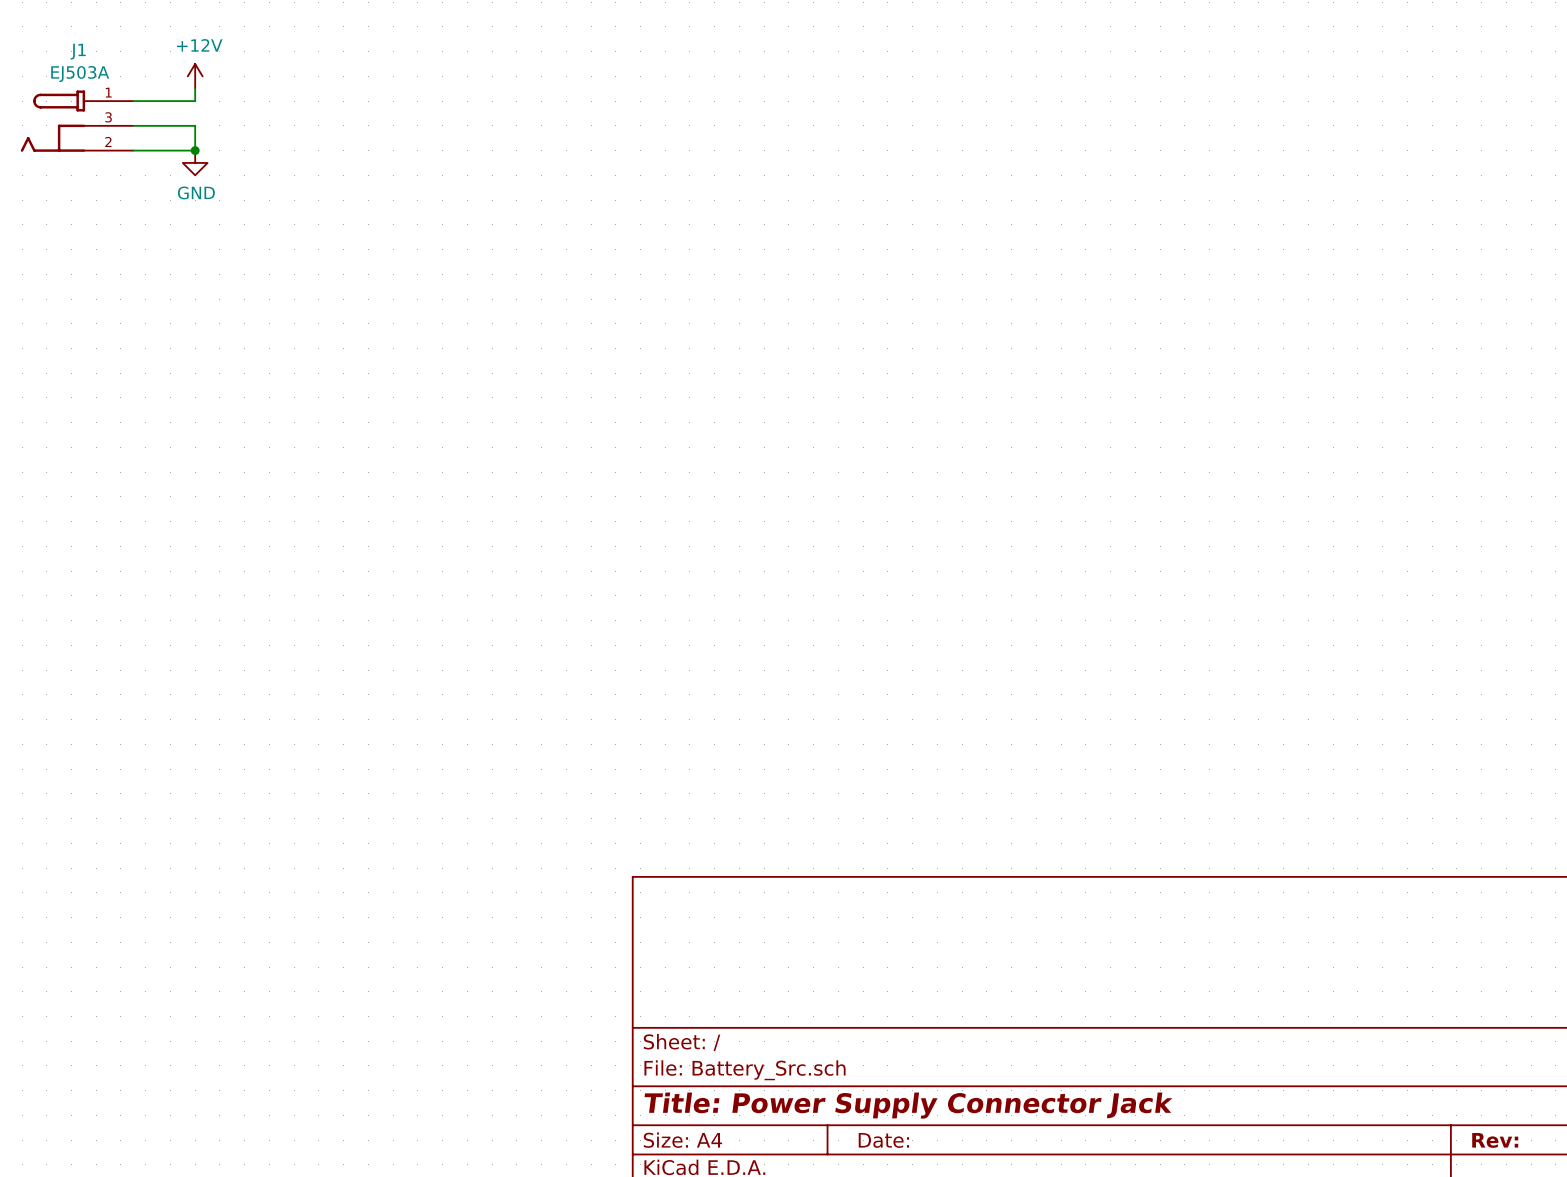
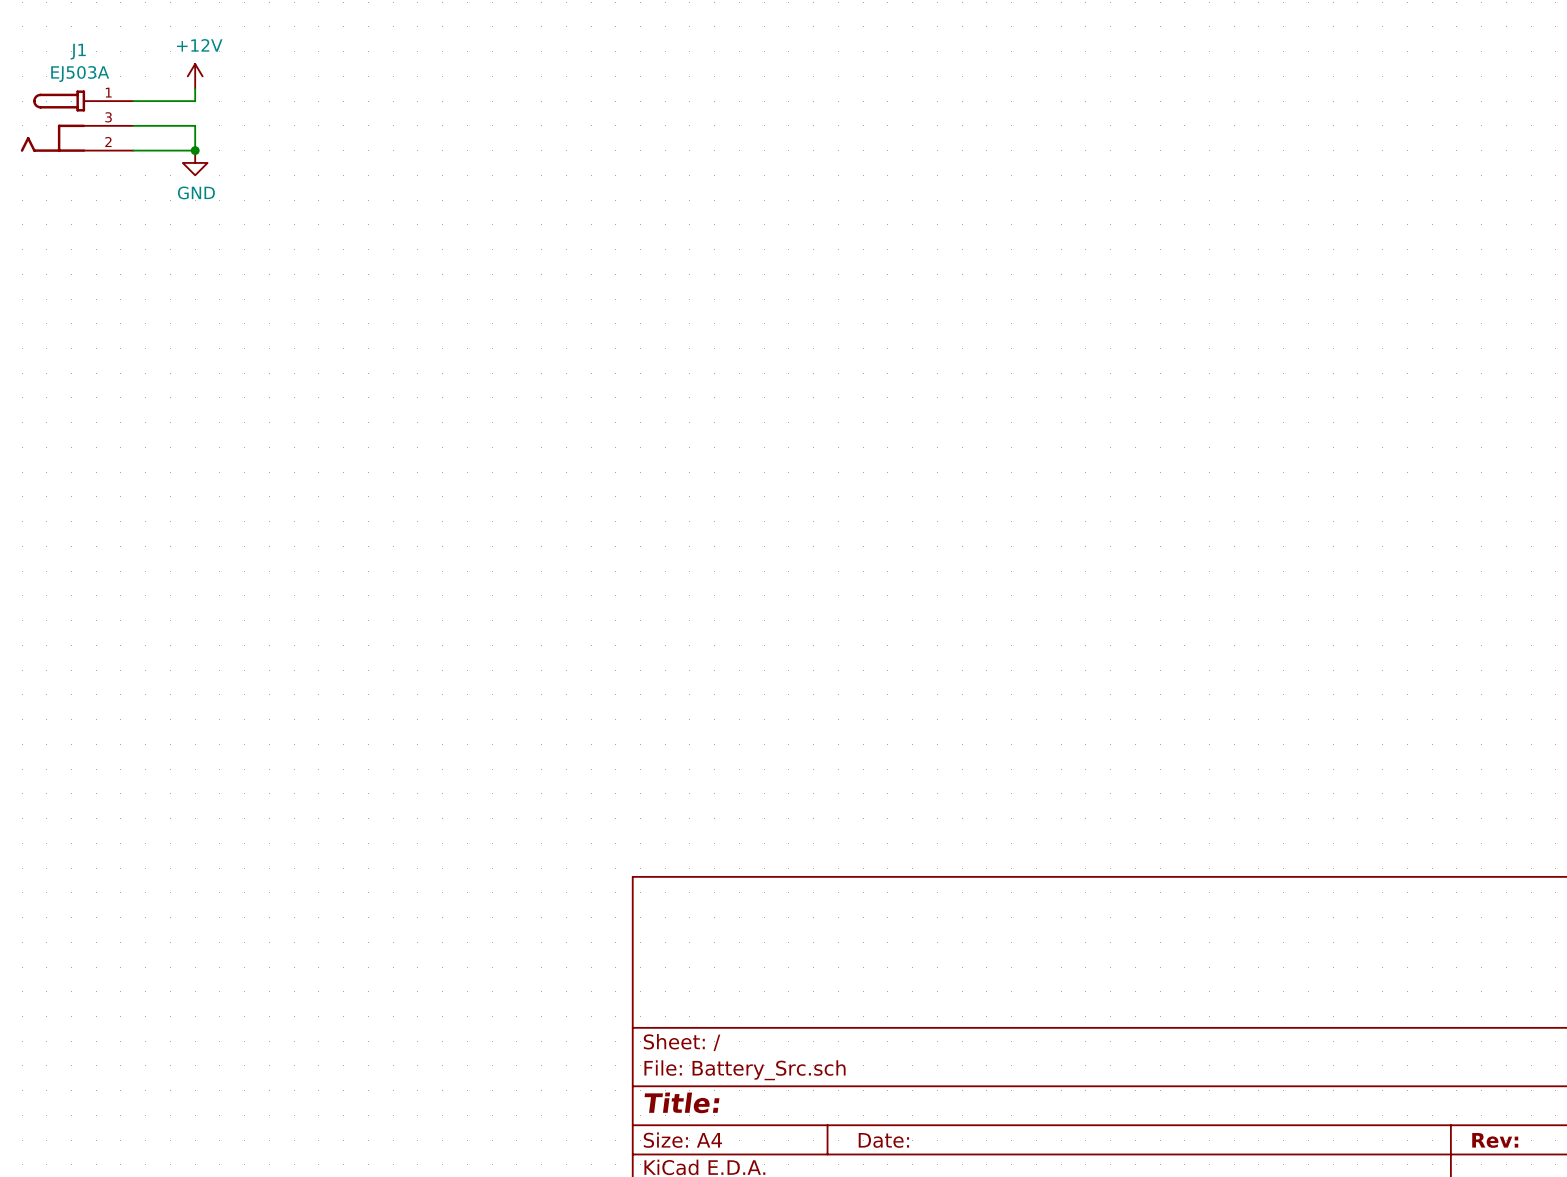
title block: Title: Power Supply Connector Jack (908, 1105) -> Title: (681, 1102)

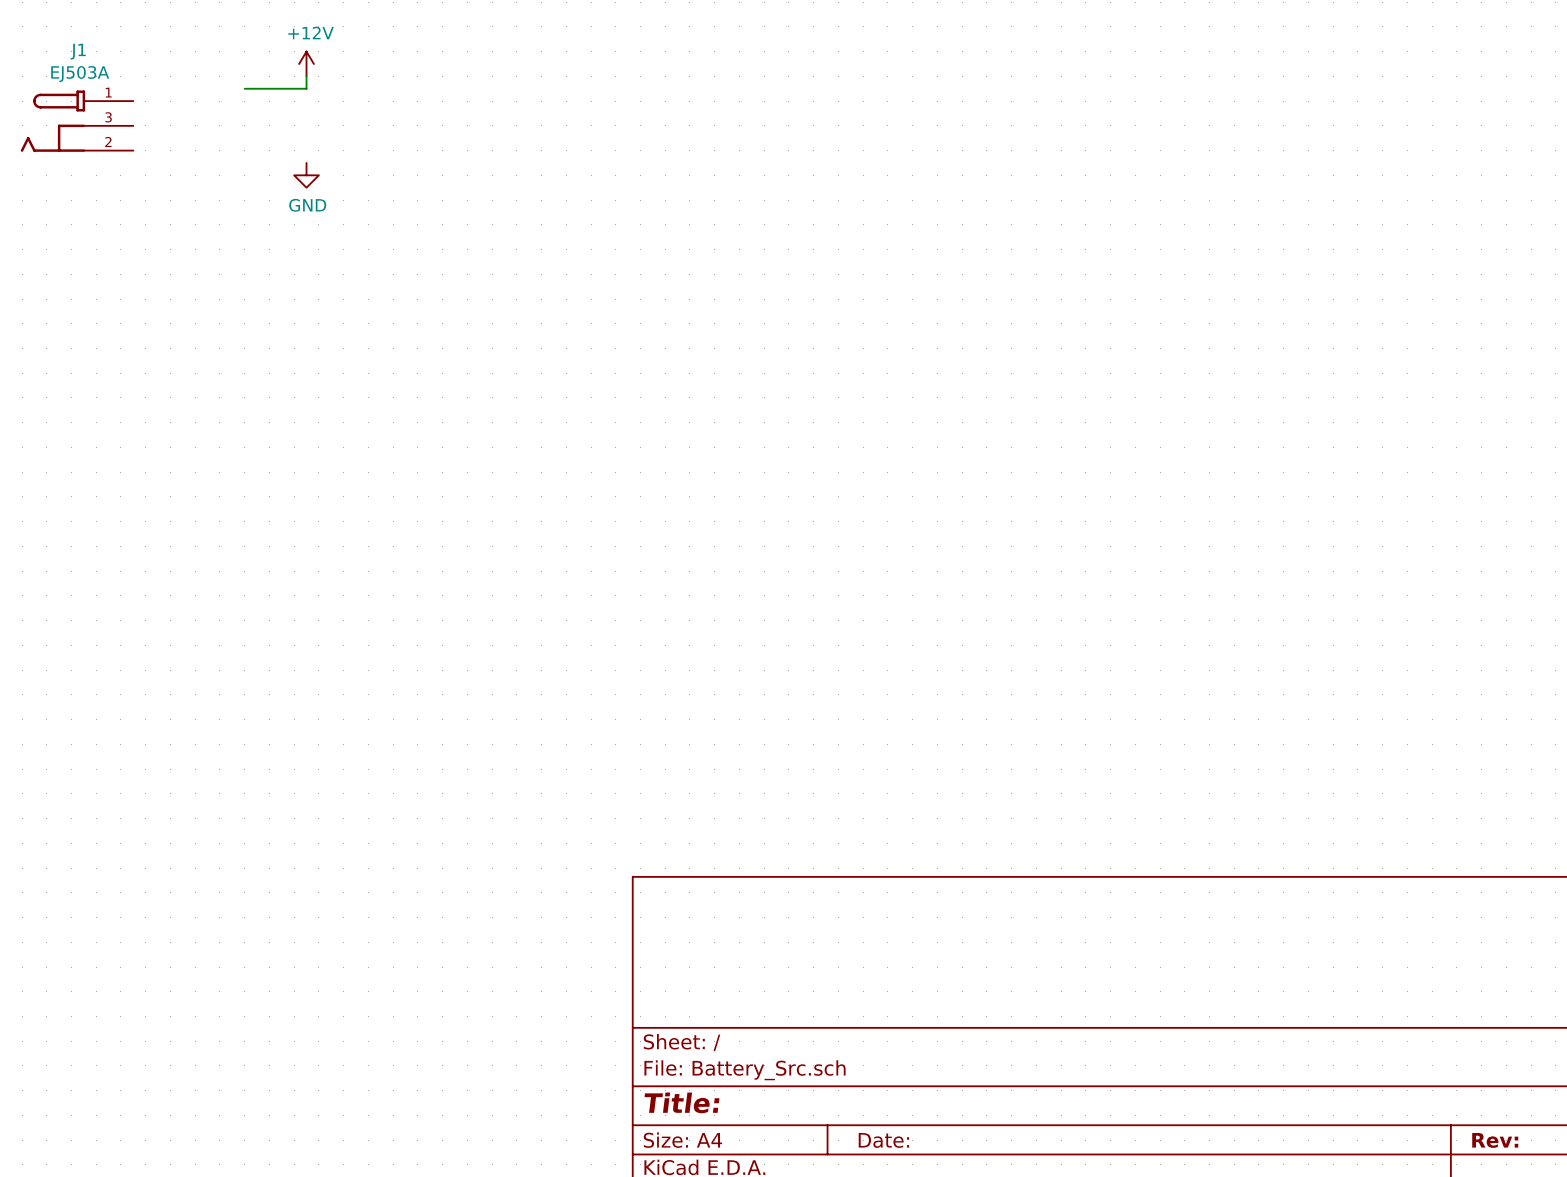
power symbol position: +12V (195, 76) -> +12V (306, 64)
wire: (195, 88) (195, 101) (133, 101) -> (306, 76) (306, 88) (244, 88)
wire: (133, 125) (195, 125) (195, 150) (133, 150) -> none
junction: (195, 150) -> none
power symbol position: GND (195, 162) -> GND (306, 175)

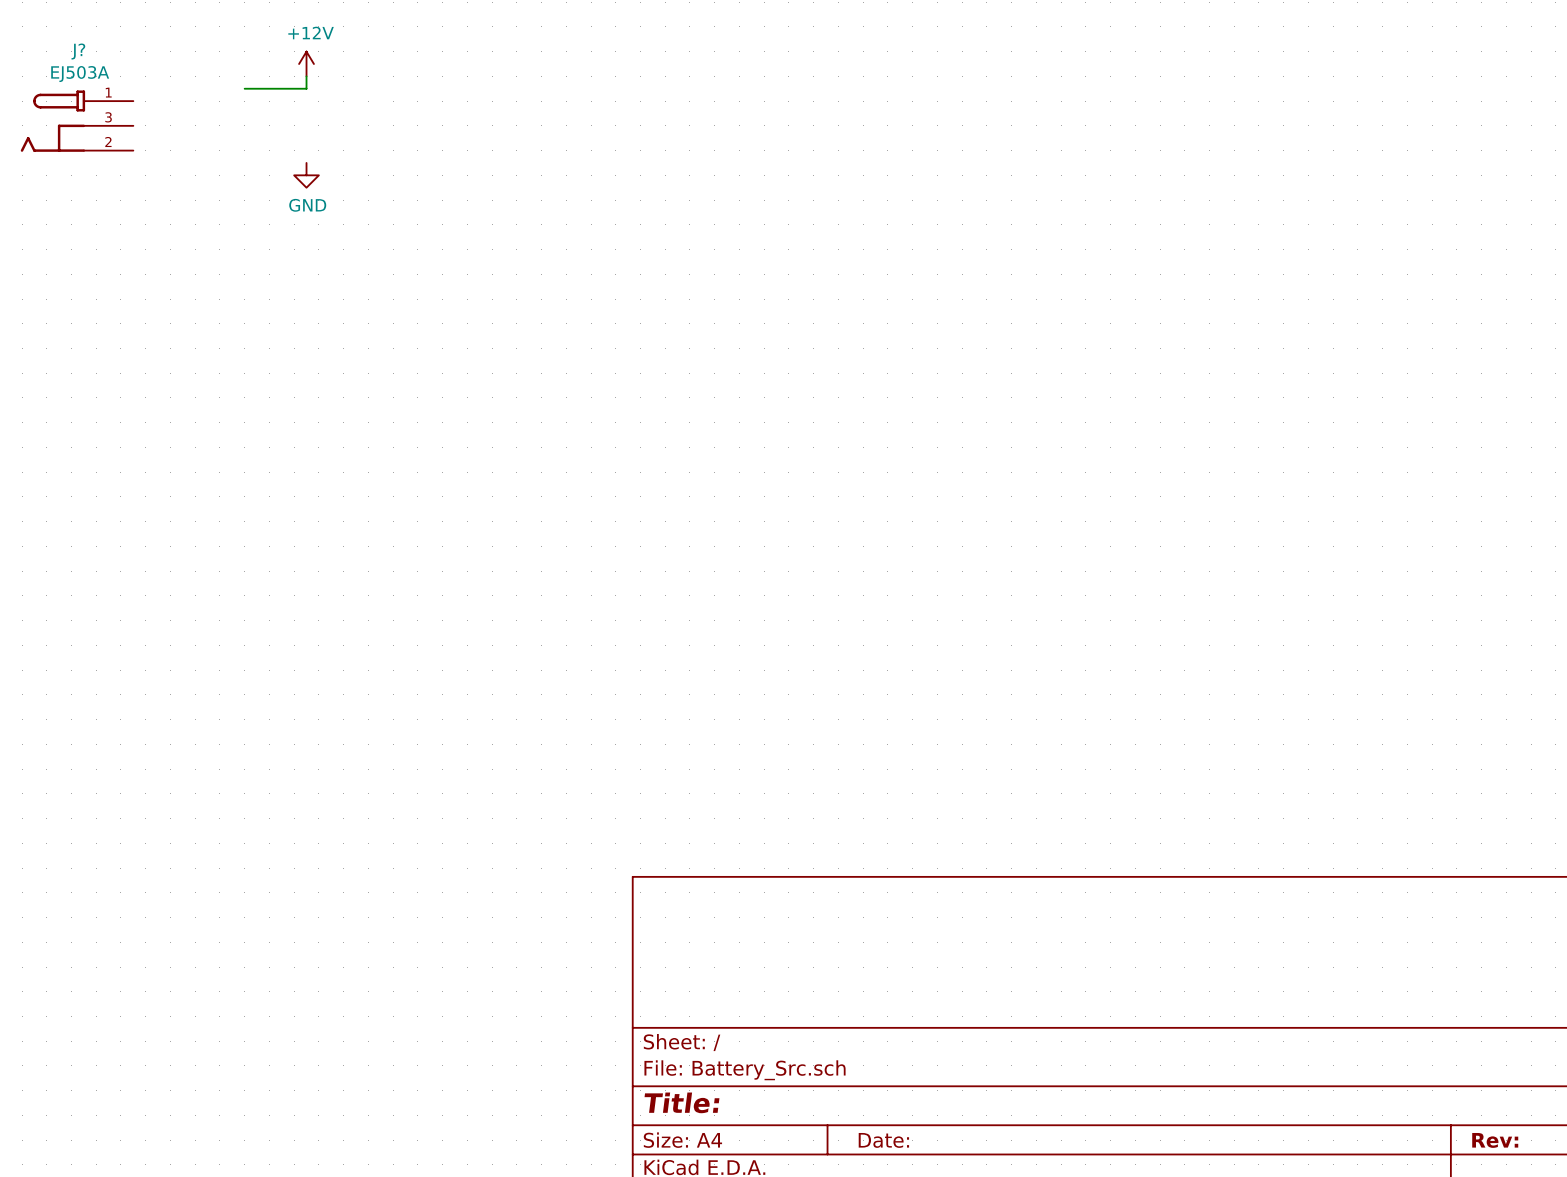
J1 name: J1 (78, 51) -> J? (78, 51)

